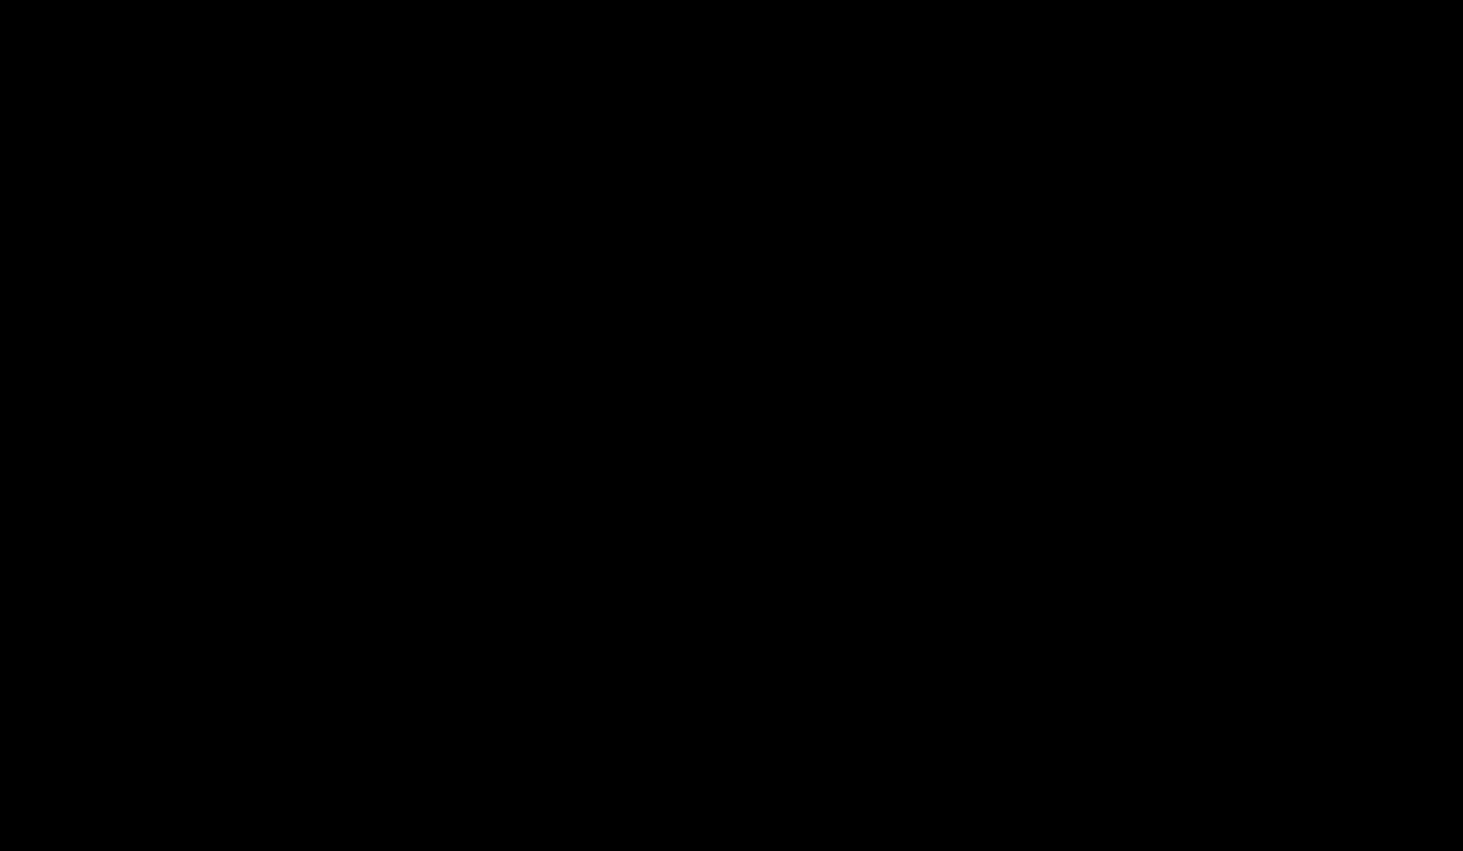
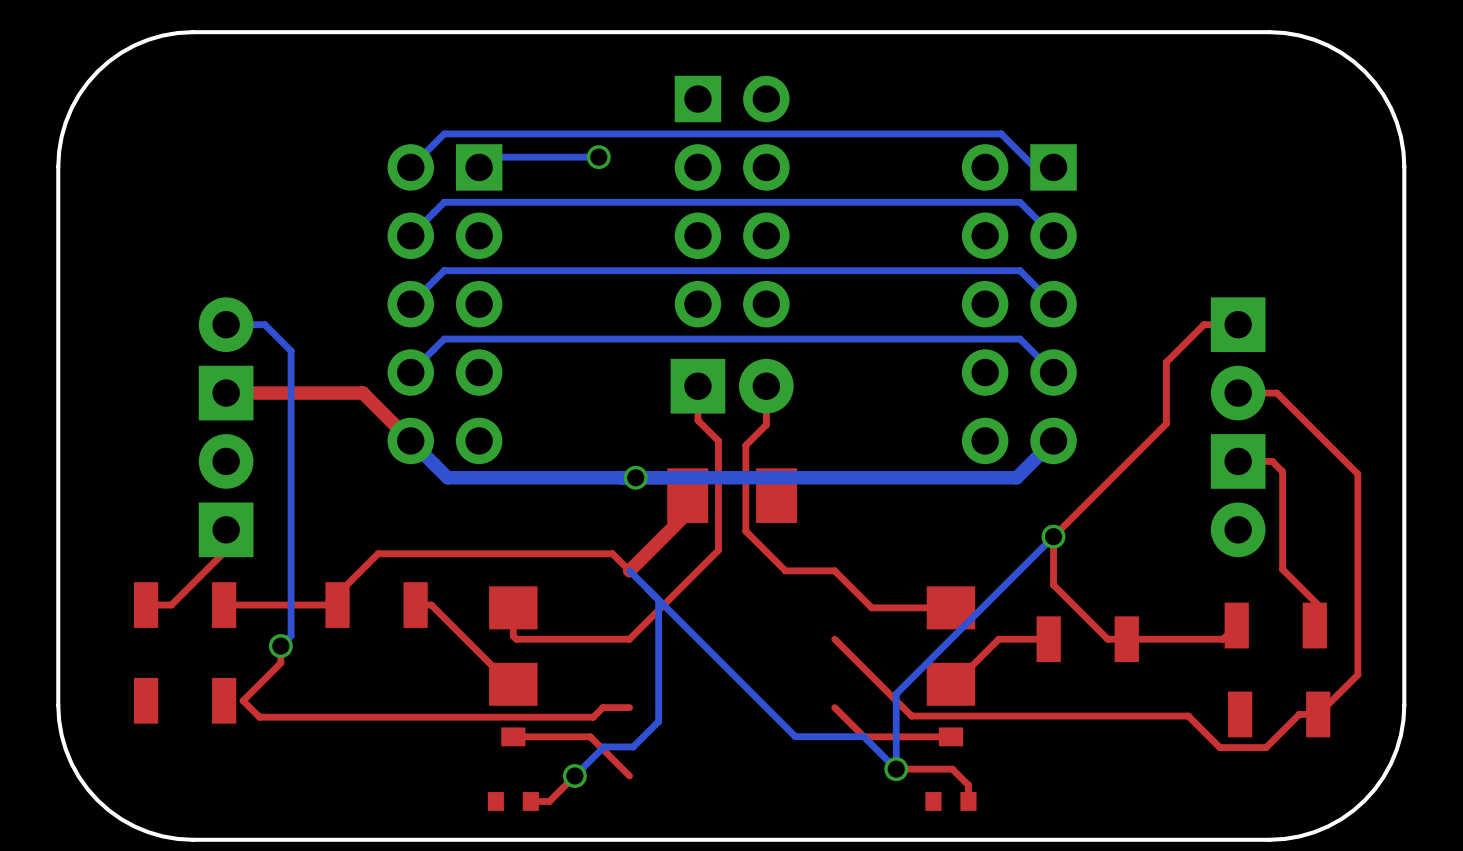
board edge: none -> (1269, 32) (192, 32) (162, 35) (148, 39) (121, 52) (97, 71) (78, 95) (65, 122) (59, 151) (58, 705) (59, 720) (65, 749) (78, 776) (97, 800) (121, 819) (148, 832) (162, 836) (192, 839) (1269, 839) (1299, 836) (1314, 832) (1341, 819) (1364, 800) (1383, 776) (1396, 749) (1403, 720) (1403, 151) (1396, 122) (1390, 108) (1383, 95) (1364, 71) (1353, 61) (1328, 45) (1299, 35) (1269, 32)
bottom track: none -> (598, 157) (489, 157) (479, 167)
via: none -> (598, 157)
bottom track: none -> (1053, 167) (1034, 167) (1001, 133) (444, 133) (410, 167)
part: none -> (732, 201)
bottom track: none -> (1053, 235) (1020, 202) (444, 202) (410, 235)
part: none -> (444, 304)
part: none -> (1019, 304)
bottom track: none -> (1053, 304) (1020, 270) (444, 270) (410, 304)
bottom track: none -> (226, 324) (264, 324) (291, 350) (291, 635) (280, 646)
top track: none -> (1238, 324) (1203, 324) (1166, 362) (1166, 423) (1053, 536) (1053, 584) (1107, 639) (1223, 639) (1236, 625) (1236, 614)
part: none -> (226, 358)
part: none -> (1238, 358)
bottom track: none -> (1053, 372) (1020, 339) (444, 339) (410, 372)
top track: none -> (697, 386) (697, 420) (718, 440) (718, 550) (629, 639) (516, 639) (513, 636) (513, 607)
part: none -> (732, 386)
top track: none -> (766, 386) (766, 424) (745, 445) (745, 531) (785, 570) (834, 570) (871, 607) (950, 607)
top track: none -> (226, 393) (362, 393) (410, 440)
top track: none -> (1238, 393) (1276, 393) (1357, 474) (1357, 674) (1318, 714) (1299, 714) (1266, 747) (1219, 747) (1188, 716) (911, 716) (834, 639)
bottom track: none -> (1053, 440) (1016, 477) (447, 477) (410, 440)
top track: none -> (1238, 461) (1272, 461) (1282, 471) (1282, 569) (1318, 605)
top track: none -> (635, 477) (669, 477) (687, 495) (687, 512) (629, 570) (612, 553) (378, 553) (337, 594) (337, 605) (224, 605)
via: none -> (635, 477)
part: none -> (226, 495)
part: none -> (732, 495)
part: none -> (1238, 495)
top track: none -> (226, 529) (226, 550) (171, 605) (146, 605)
bottom track: none -> (1053, 536) (896, 693) (896, 769) (863, 736) (795, 736) (629, 570)
via: none -> (1053, 536)
bottom track: none -> (658, 599) (658, 721) (633, 746) (603, 746) (574, 775)
part: none -> (185, 605)
part: none -> (376, 605)
top track: none -> (415, 605) (431, 605) (510, 684) (513, 684)
part: none -> (1275, 625)
top track: none -> (1048, 639) (998, 639) (953, 684) (950, 684)
part: none -> (1087, 639)
top track: none -> (280, 646) (280, 663) (243, 700) (259, 717) (593, 717) (602, 707) (629, 707)
via: none -> (280, 646)
part: none -> (513, 646)
part: none -> (950, 646)
part: none -> (185, 700)
top track: none -> (834, 707) (863, 736) (950, 736)
part: none -> (1279, 714)
top track: none -> (513, 736) (590, 736) (629, 775)
part: none -> (513, 769)
top track: none -> (896, 769) (952, 769) (968, 785) (968, 802)
via: none -> (896, 769)
part: none -> (950, 769)
top track: none -> (574, 775) (549, 801) (530, 801)
via: none -> (574, 775)

